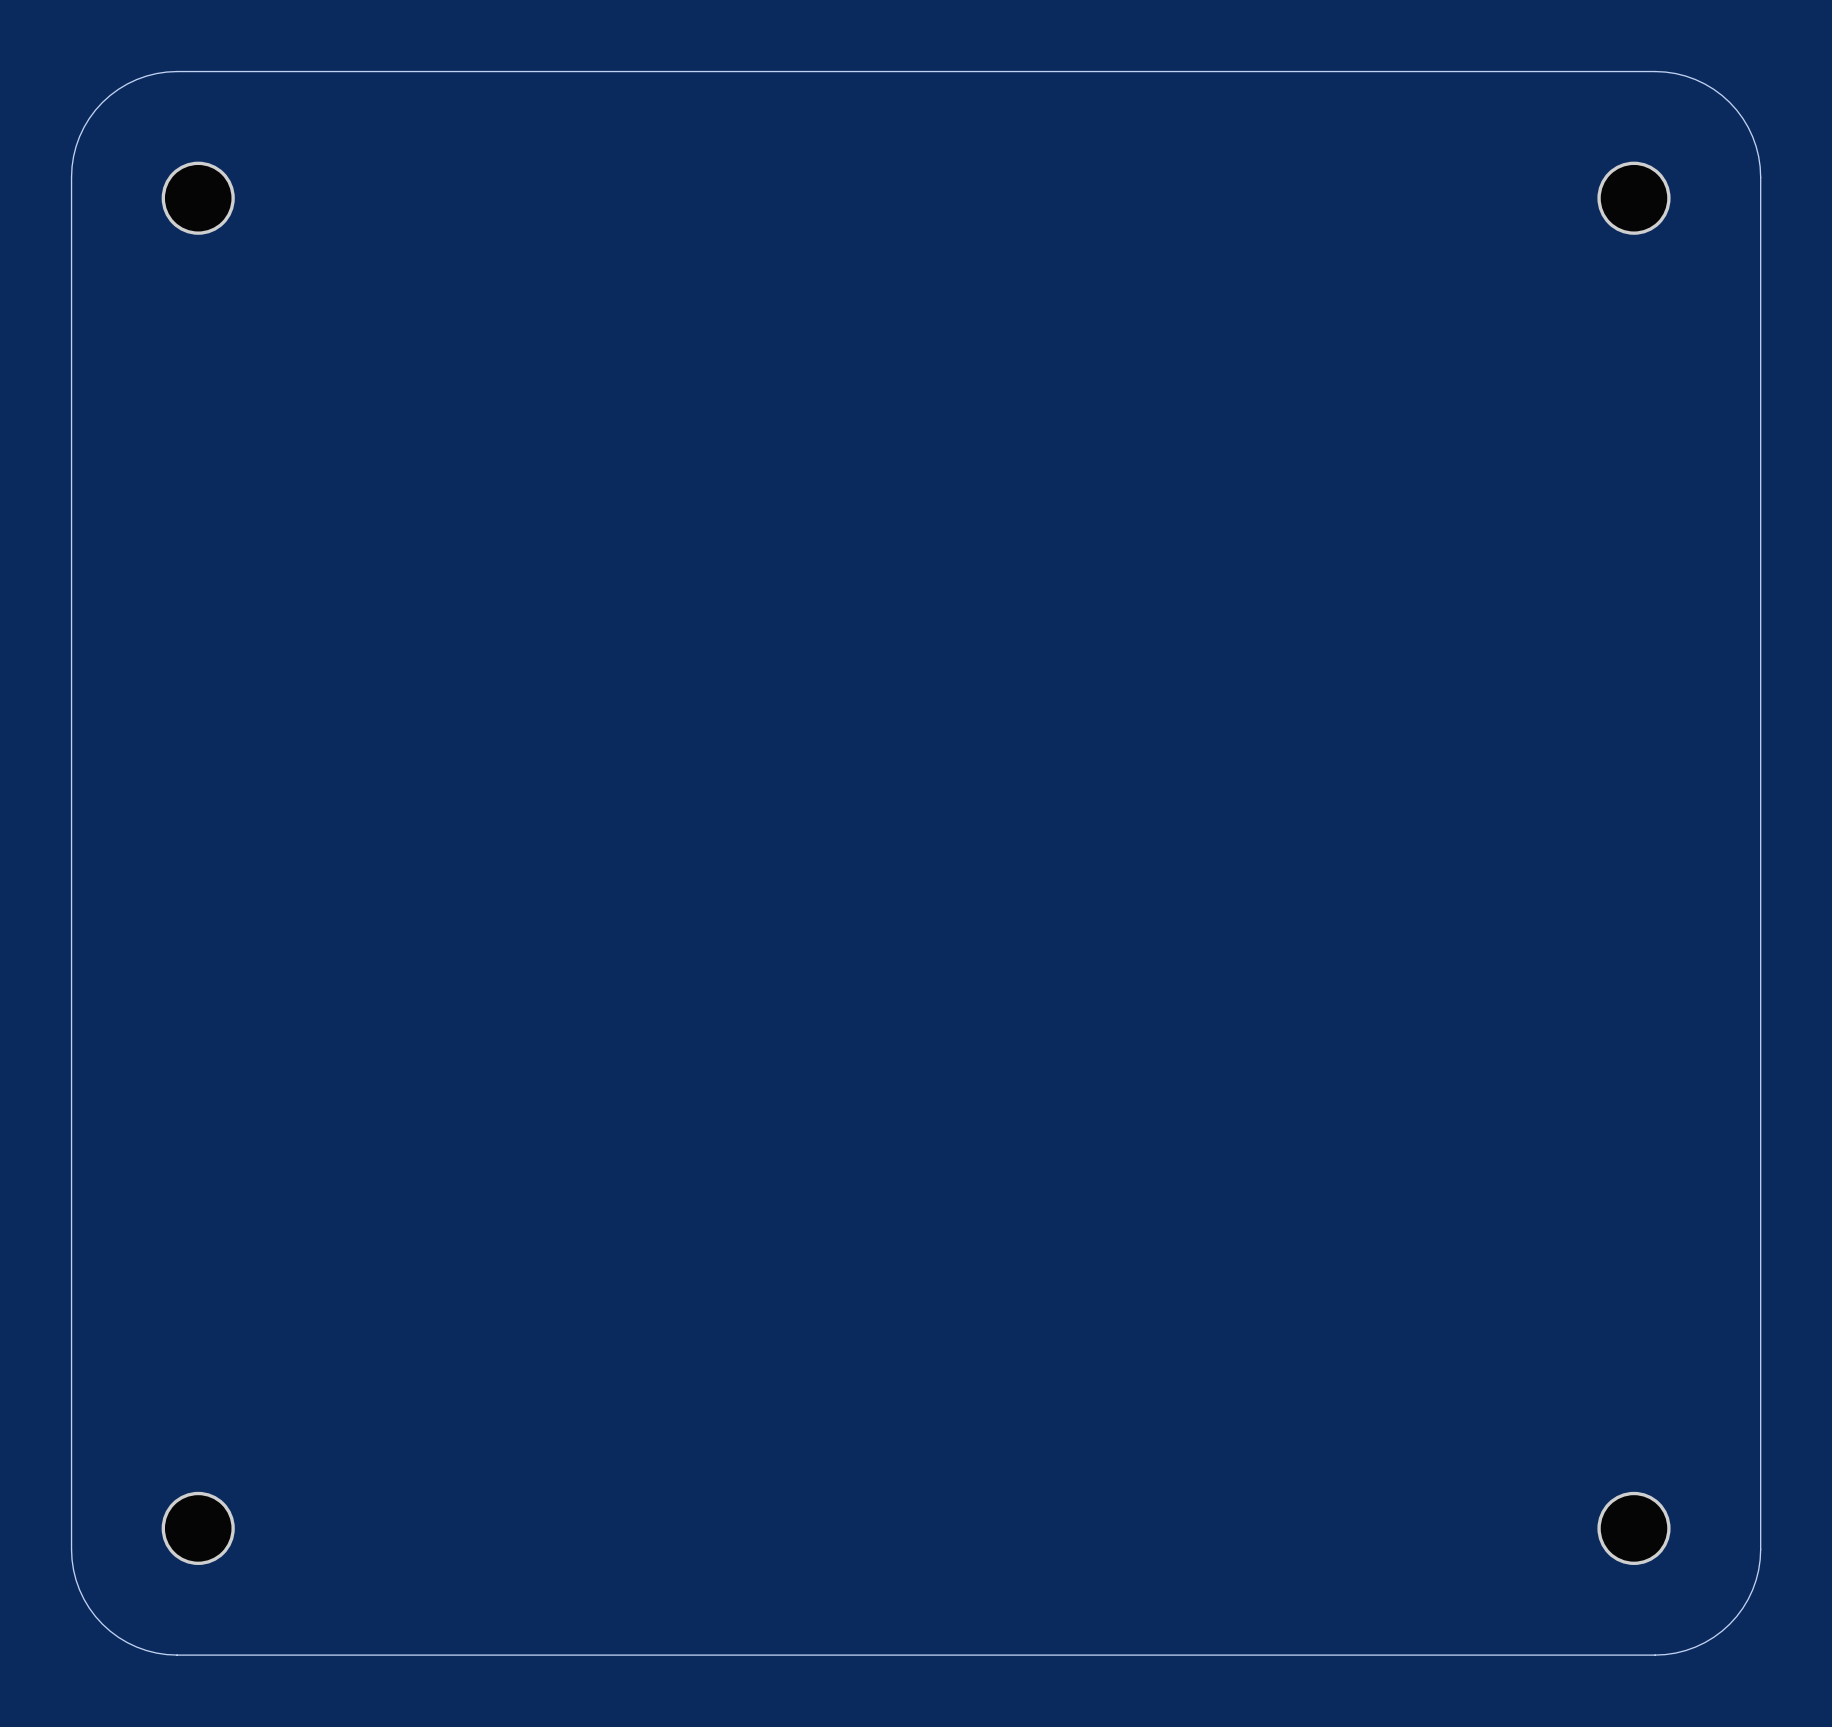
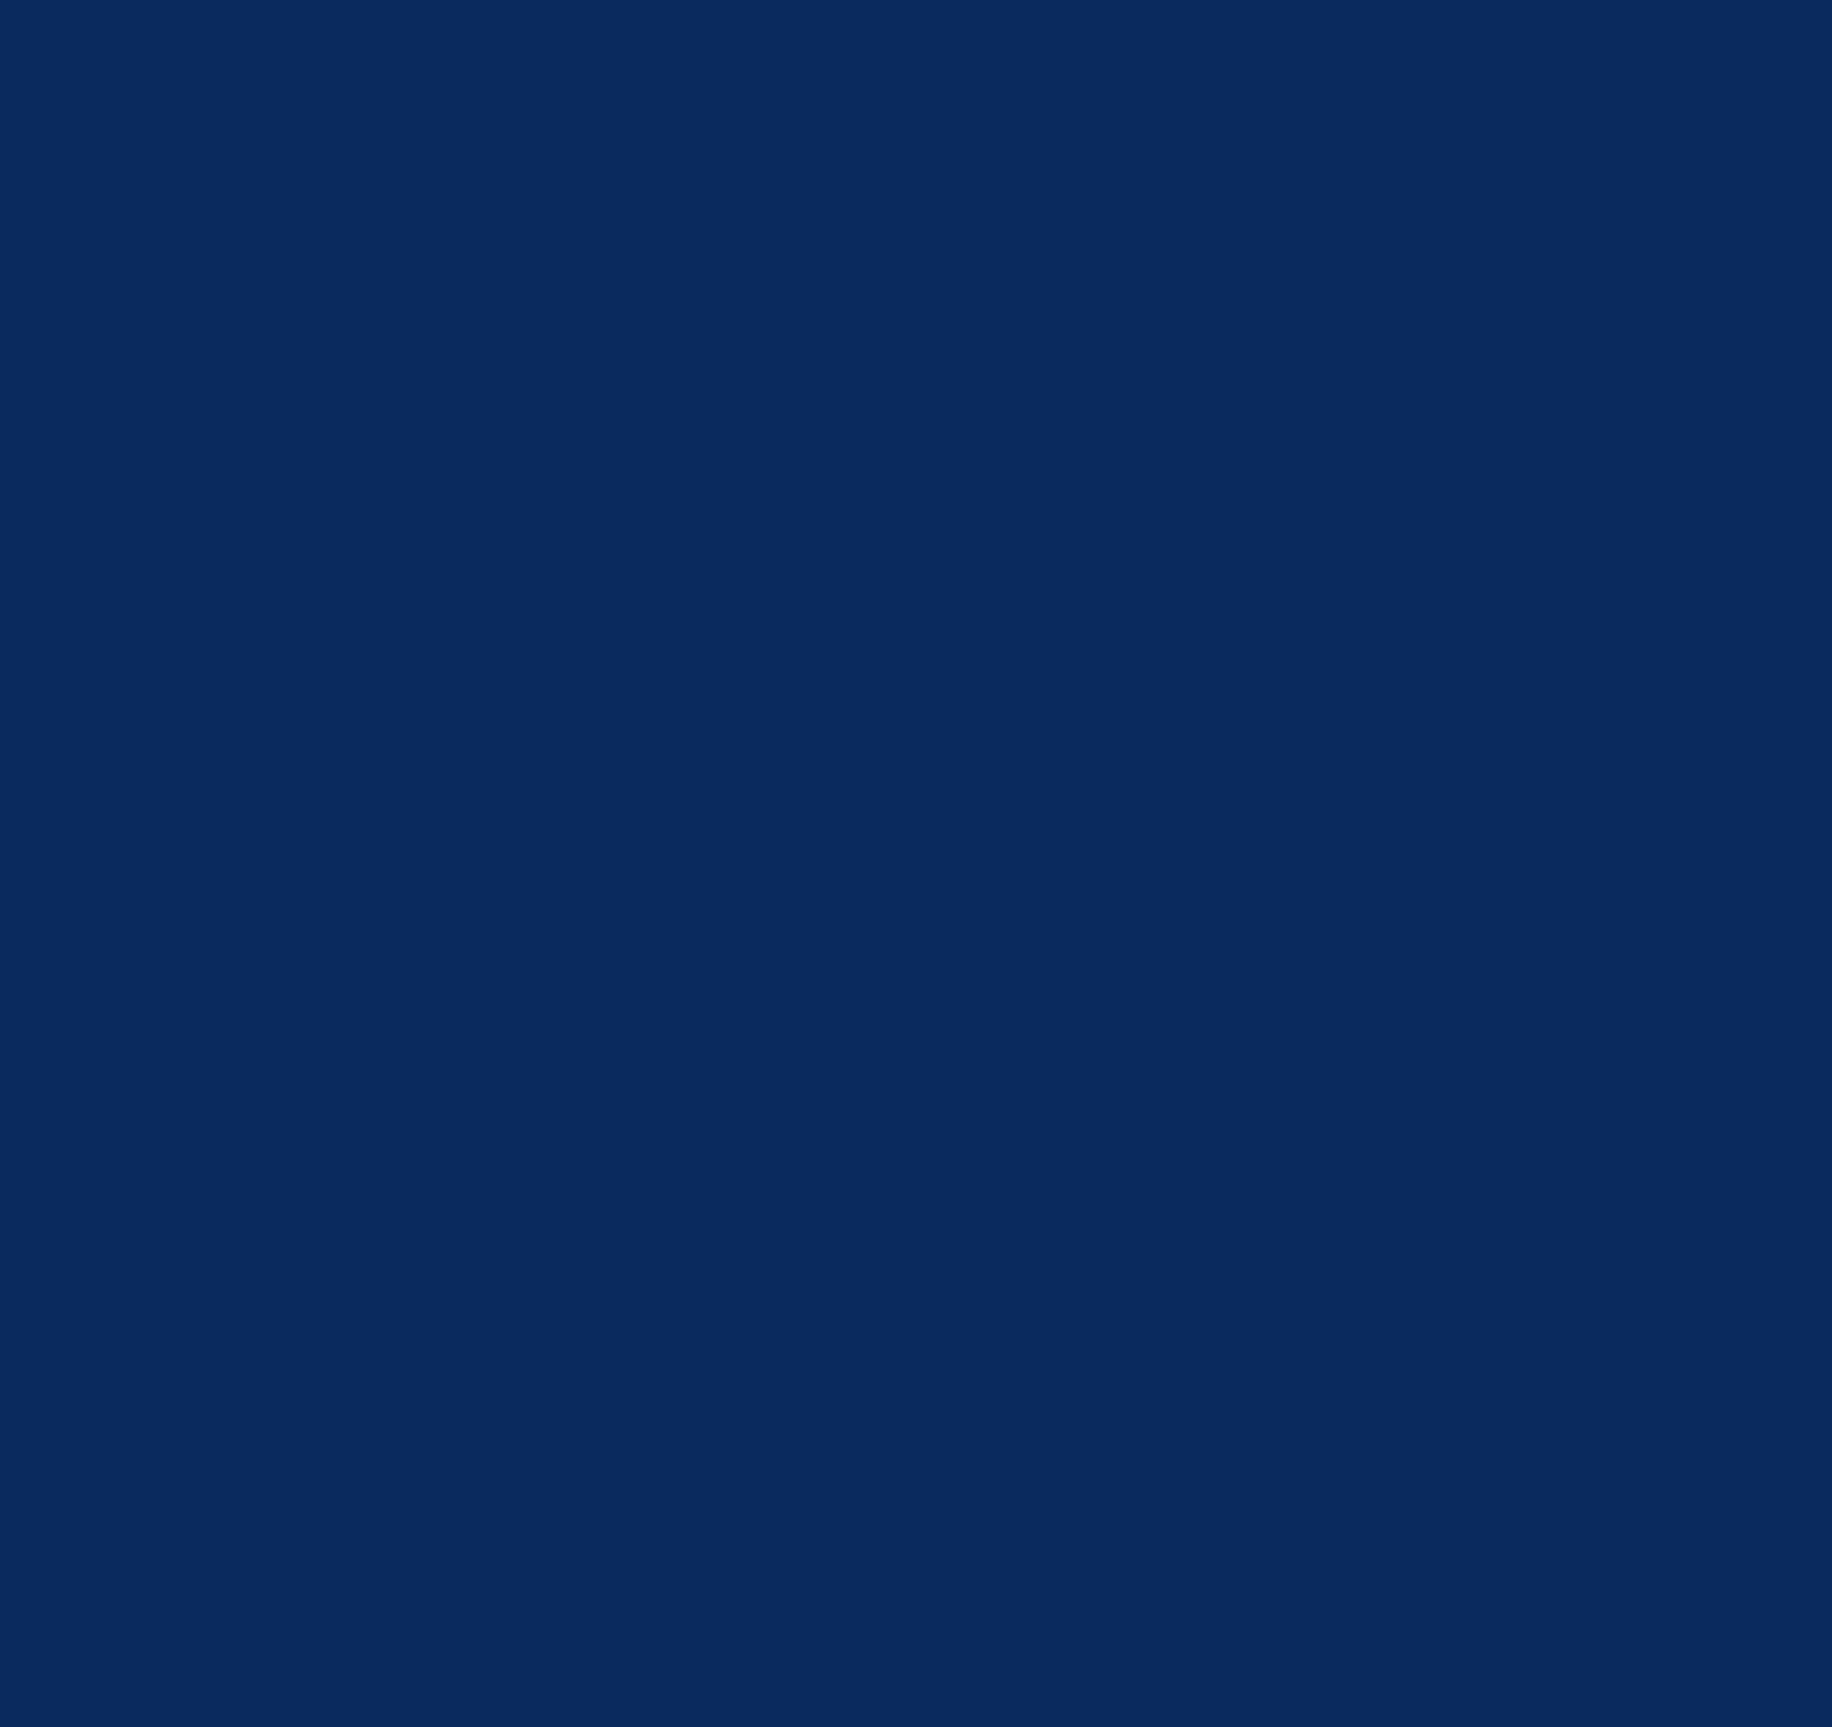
board edge: (1655, 71) (177, 71) (156, 73) (136, 79) (118, 89) (102, 102) (89, 118) (79, 136) (73, 156) (71, 177) (71, 1549) (73, 1570) (79, 1589) (89, 1608) (102, 1624) (118, 1637) (136, 1647) (156, 1653) (177, 1655) (1655, 1655) (1675, 1653) (1695, 1647) (1713, 1637) (1729, 1624) (1742, 1608) (1752, 1589) (1758, 1570) (1760, 1549) (1760, 177) (1758, 156) (1752, 136) (1742, 118) (1729, 102) (1713, 89) (1695, 79) (1675, 73) (1655, 71) -> none
part: (198, 198) -> none
part: (1633, 198) -> none
part: (198, 1528) -> none
part: (1633, 1528) -> none

